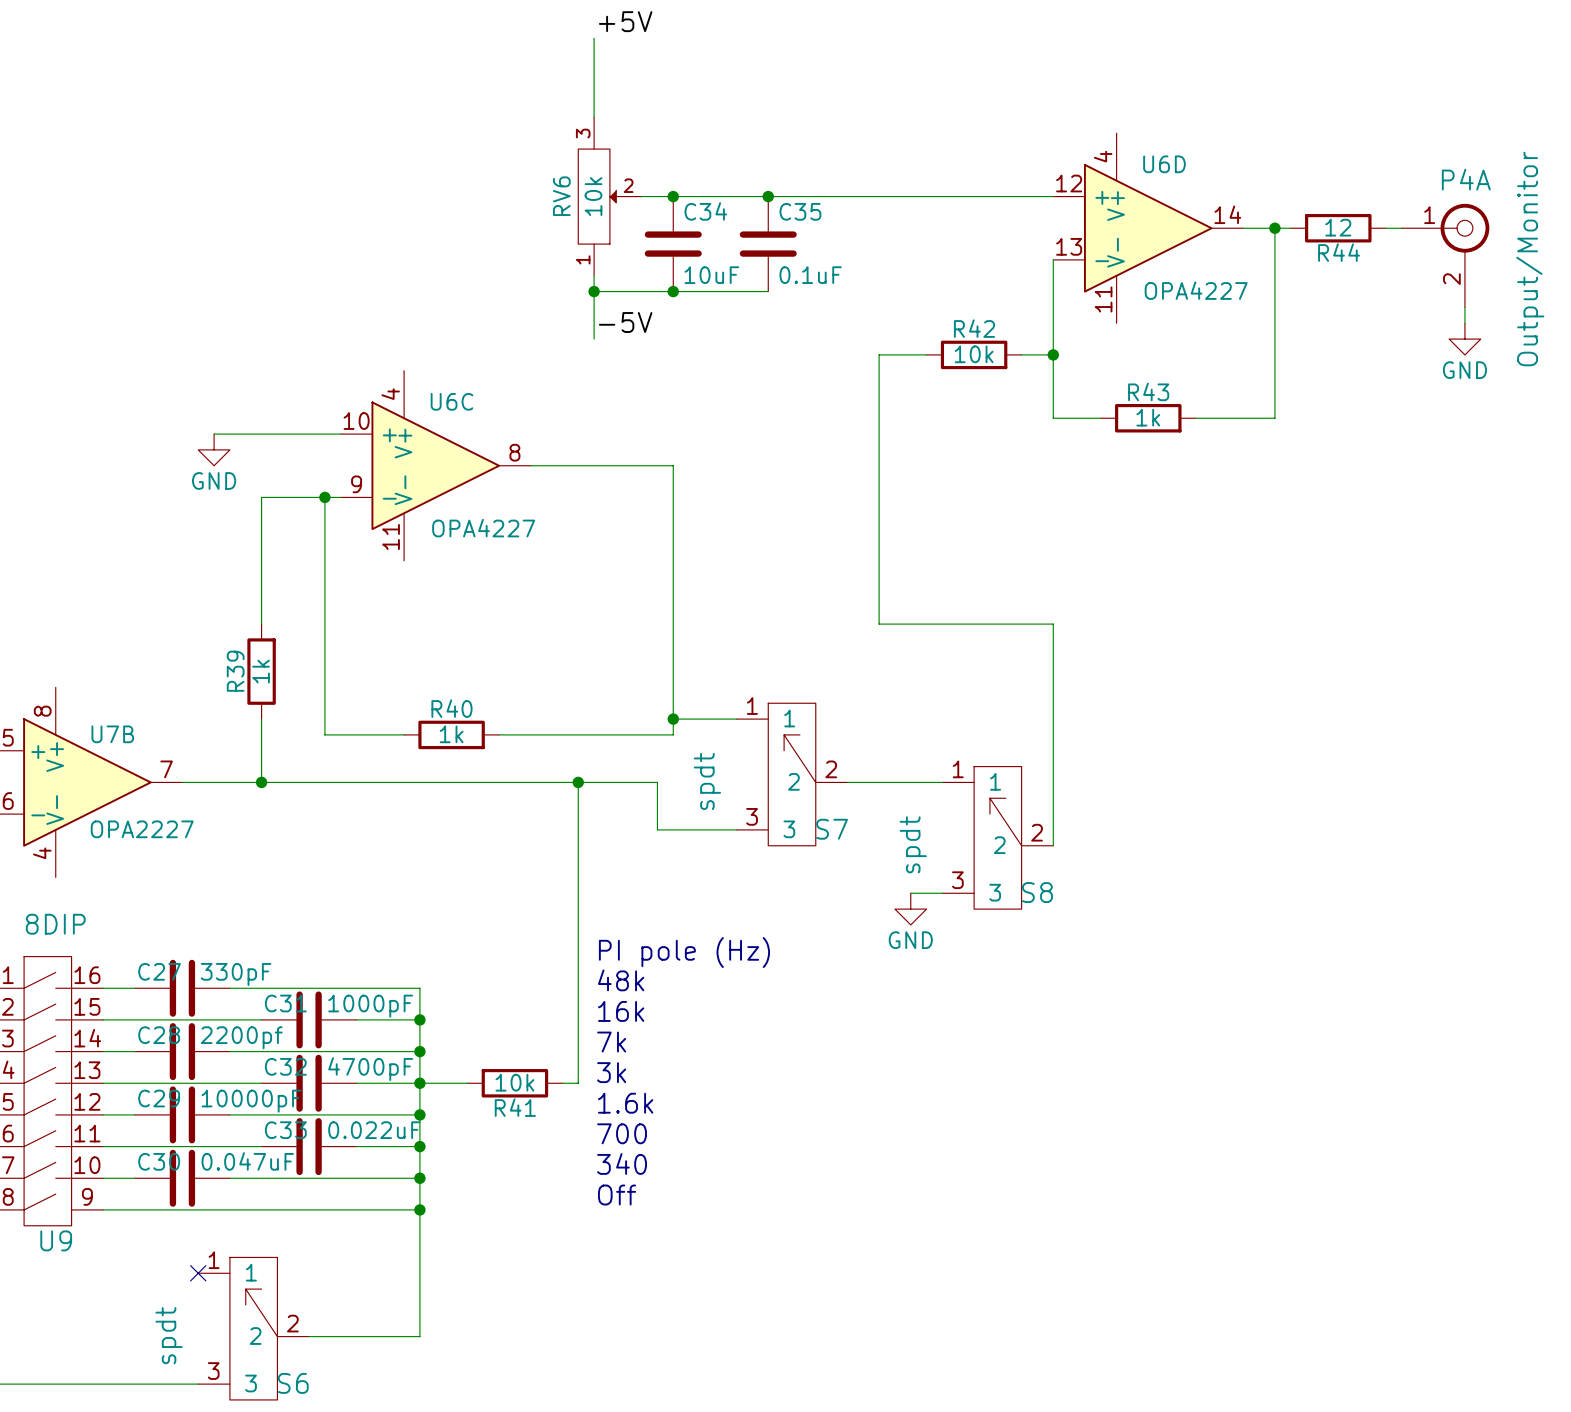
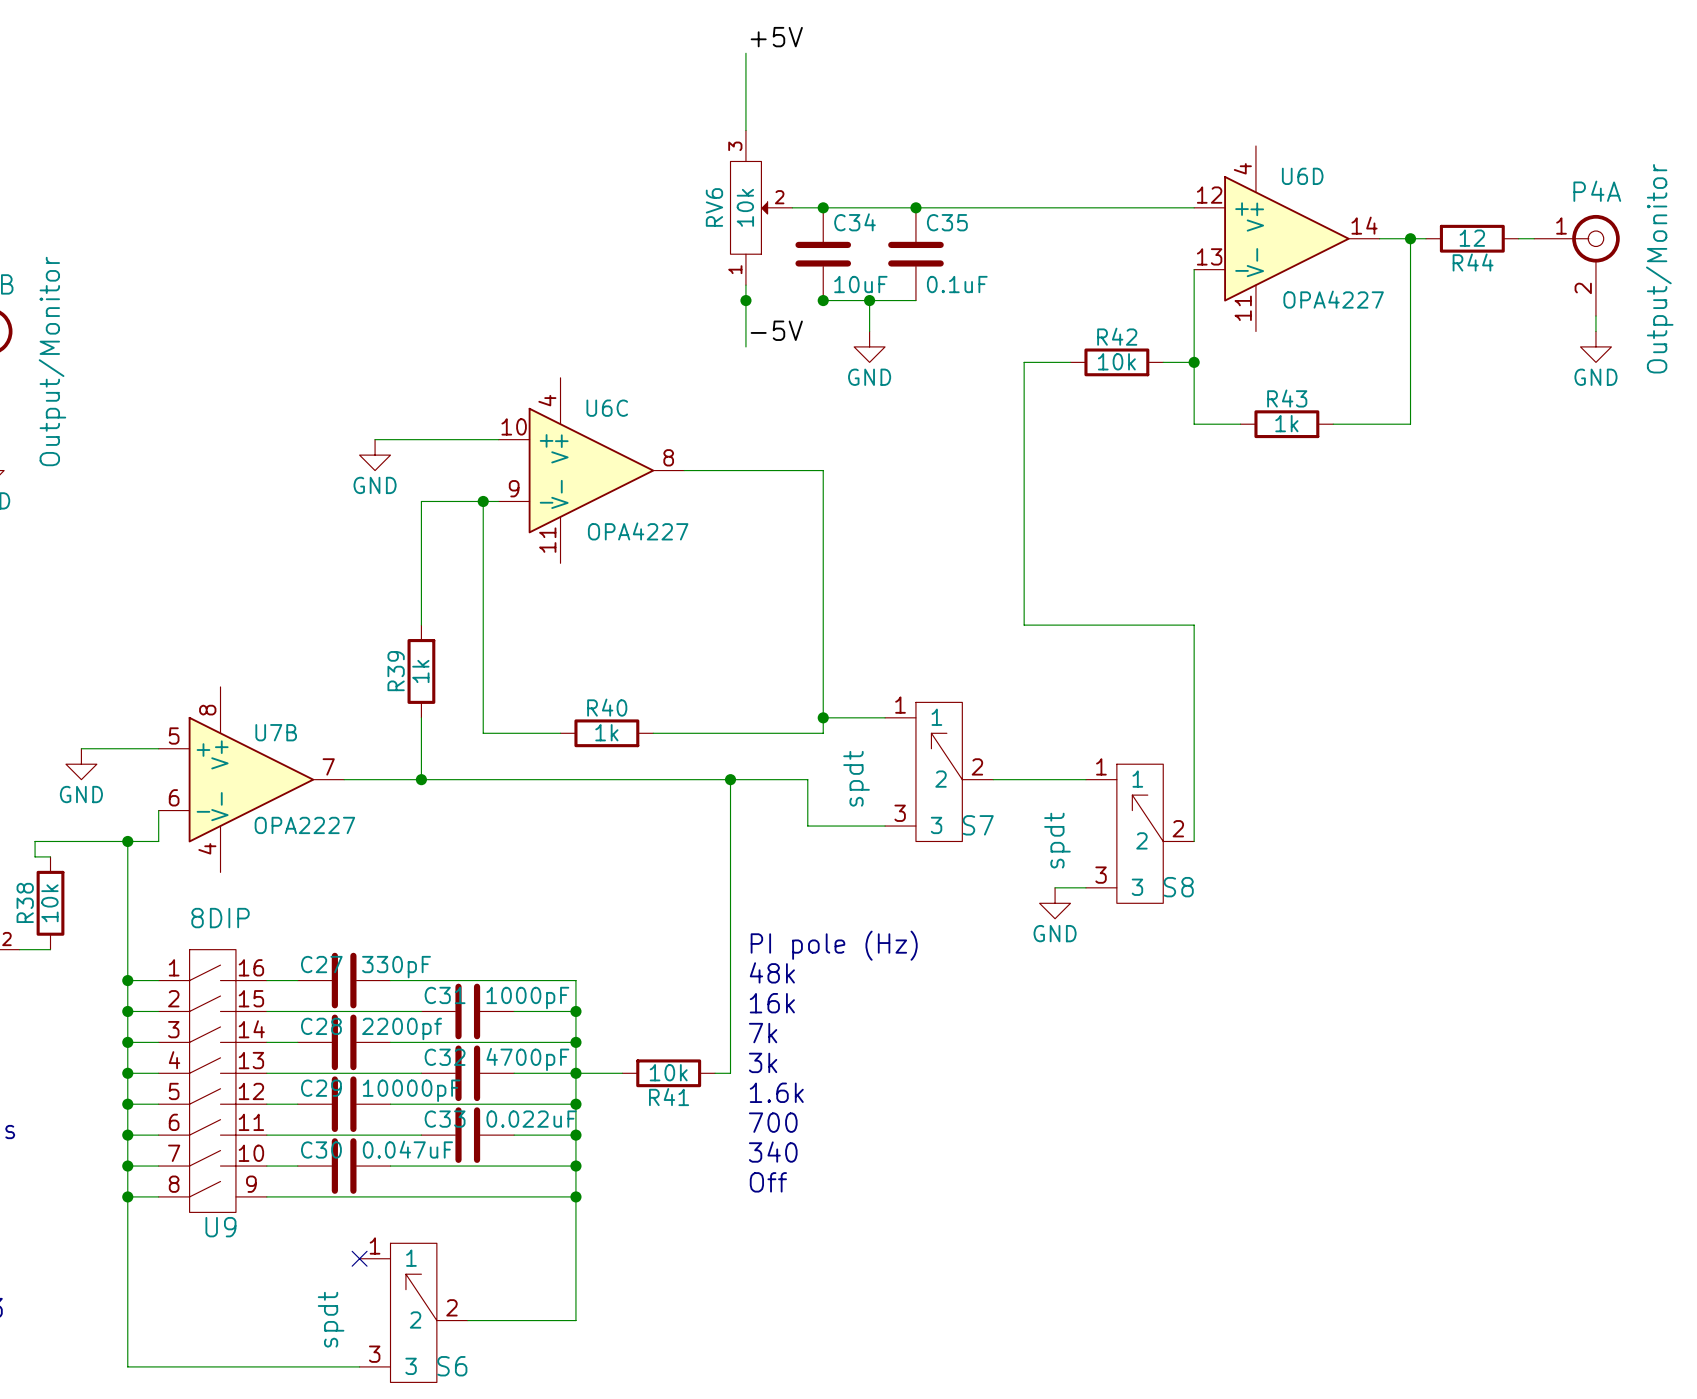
wire: (594, 291) (673, 291) -> none
wire: none -> (869, 300) (869, 331)
junction: none -> (869, 300)
power symbol: none -> GND (869, 346)

